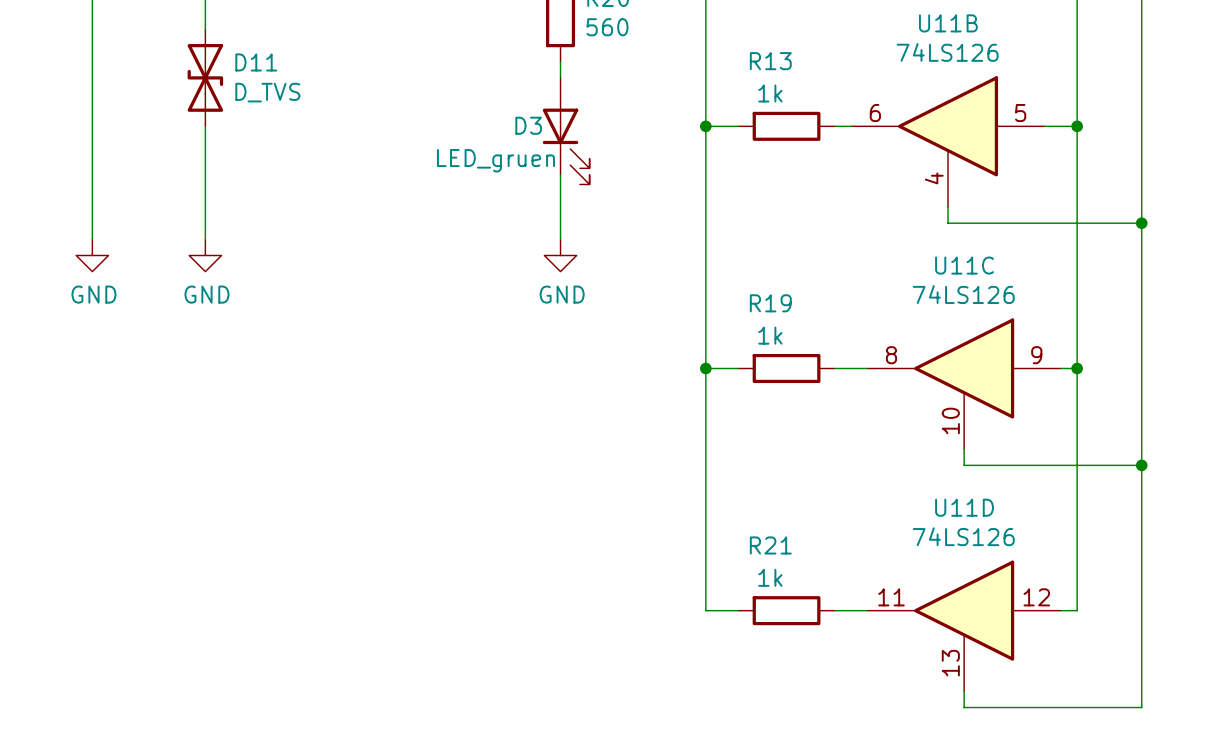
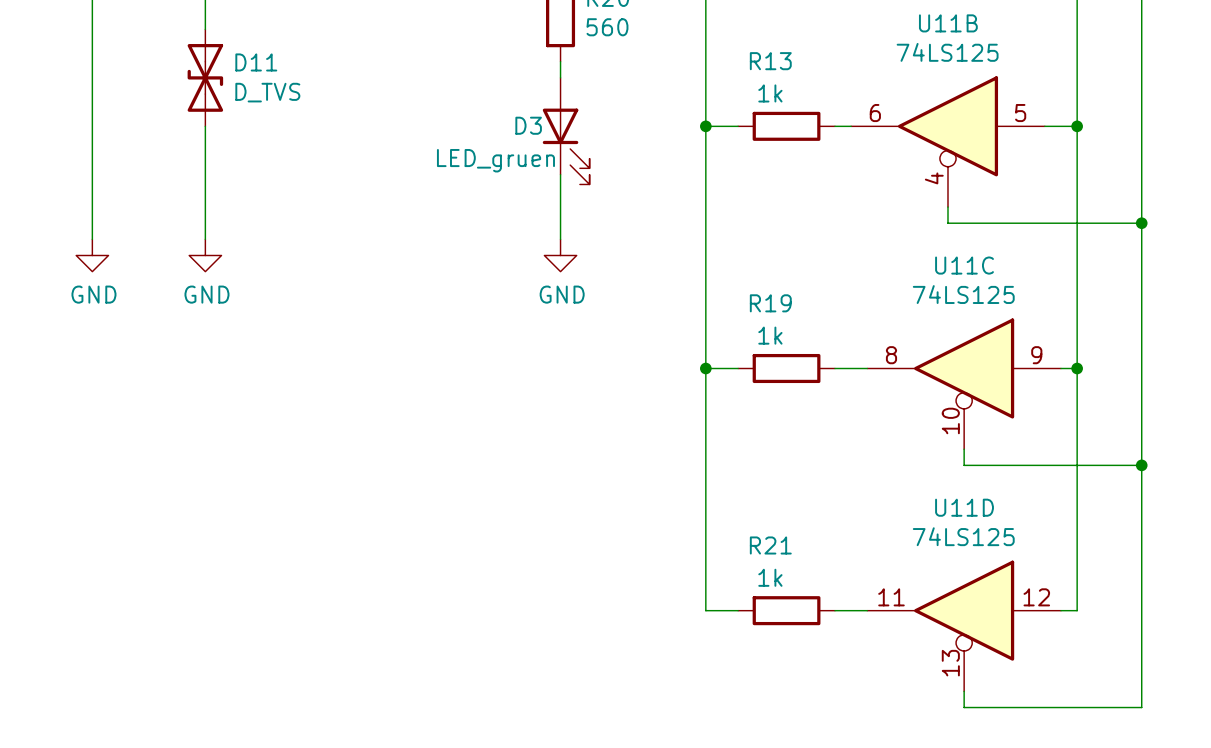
U11B value: 74LS126 (947, 52) -> 74LS125 (947, 52)
U11B symbol: [851, 76, 1045, 208] -> [851, 76, 1045, 208]
U11C value: 74LS126 (963, 294) -> 74LS125 (963, 294)
U11C symbol: [867, 318, 1062, 450] -> [867, 318, 1062, 450]
U11D value: 74LS126 (963, 536) -> 74LS125 (963, 536)
U11D symbol: [867, 560, 1062, 692] -> [867, 560, 1062, 692]

